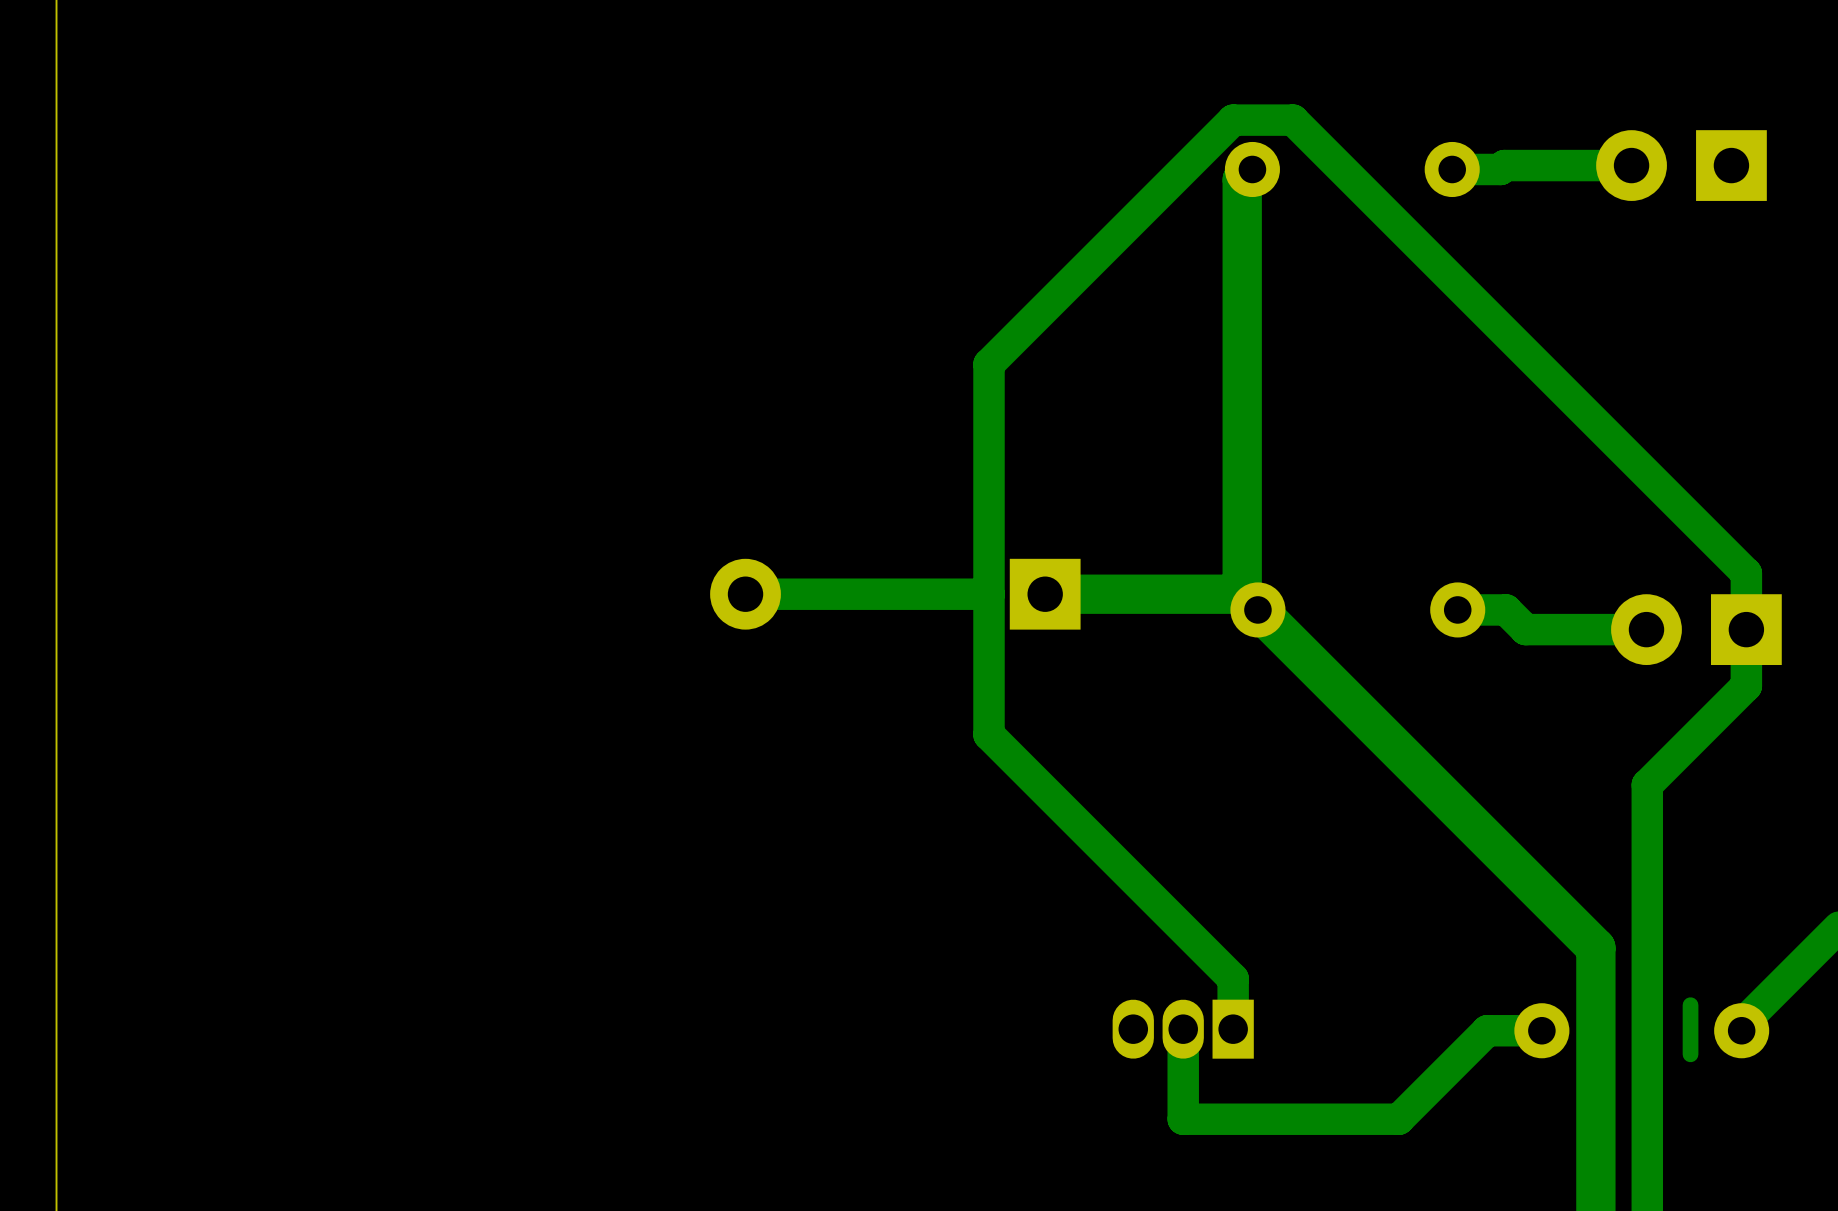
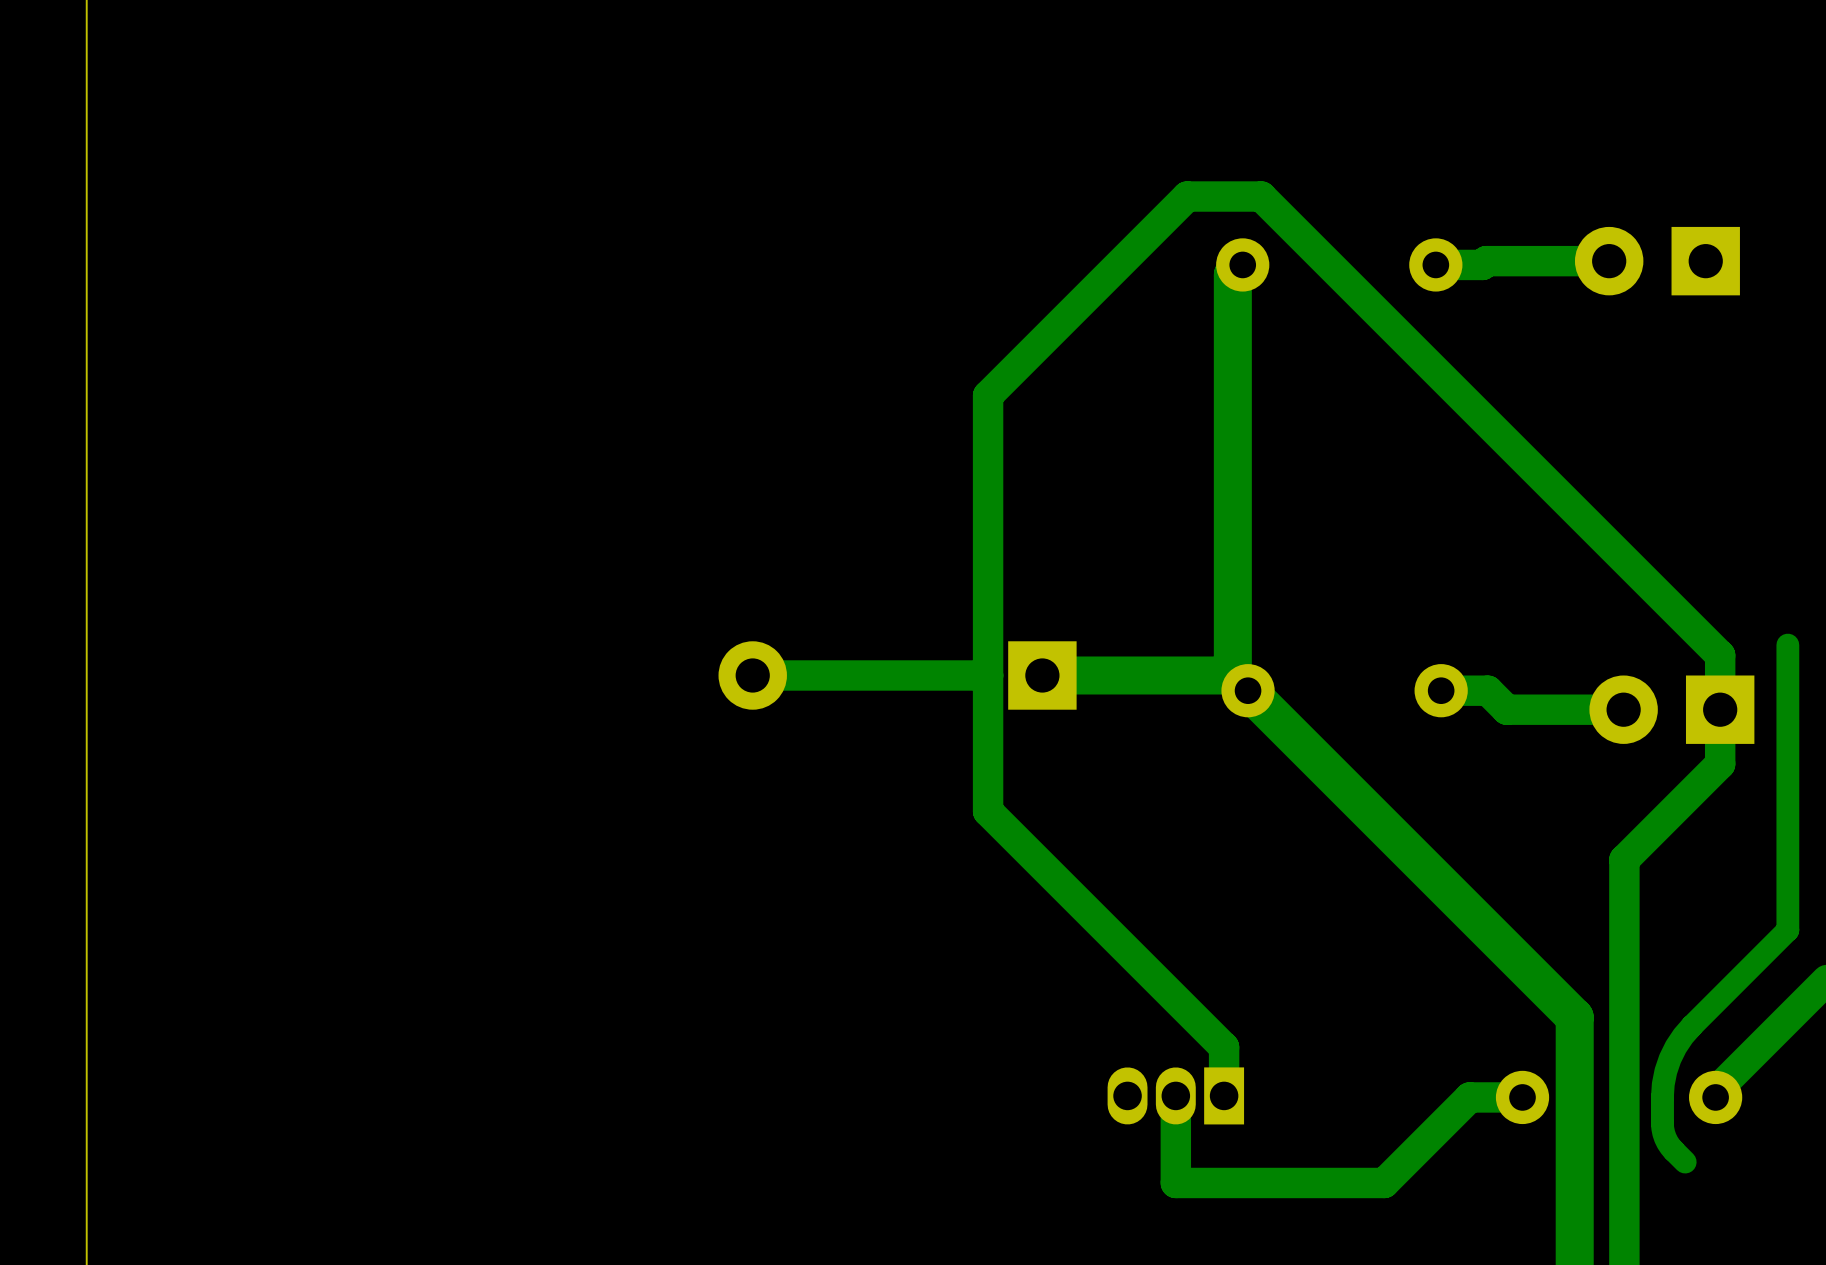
bottom track: (1293, 120) (1233, 120) (989, 364) -> (1282, 217) (1261, 196) (1187, 196) (988, 395) (988, 453)
bottom track: none -> (1787, 645) (1787, 930) (1691, 1026) (1675, 1046) (1670, 1058) (1663, 1084) (1662, 1128) (1667, 1142) (1685, 1162)

